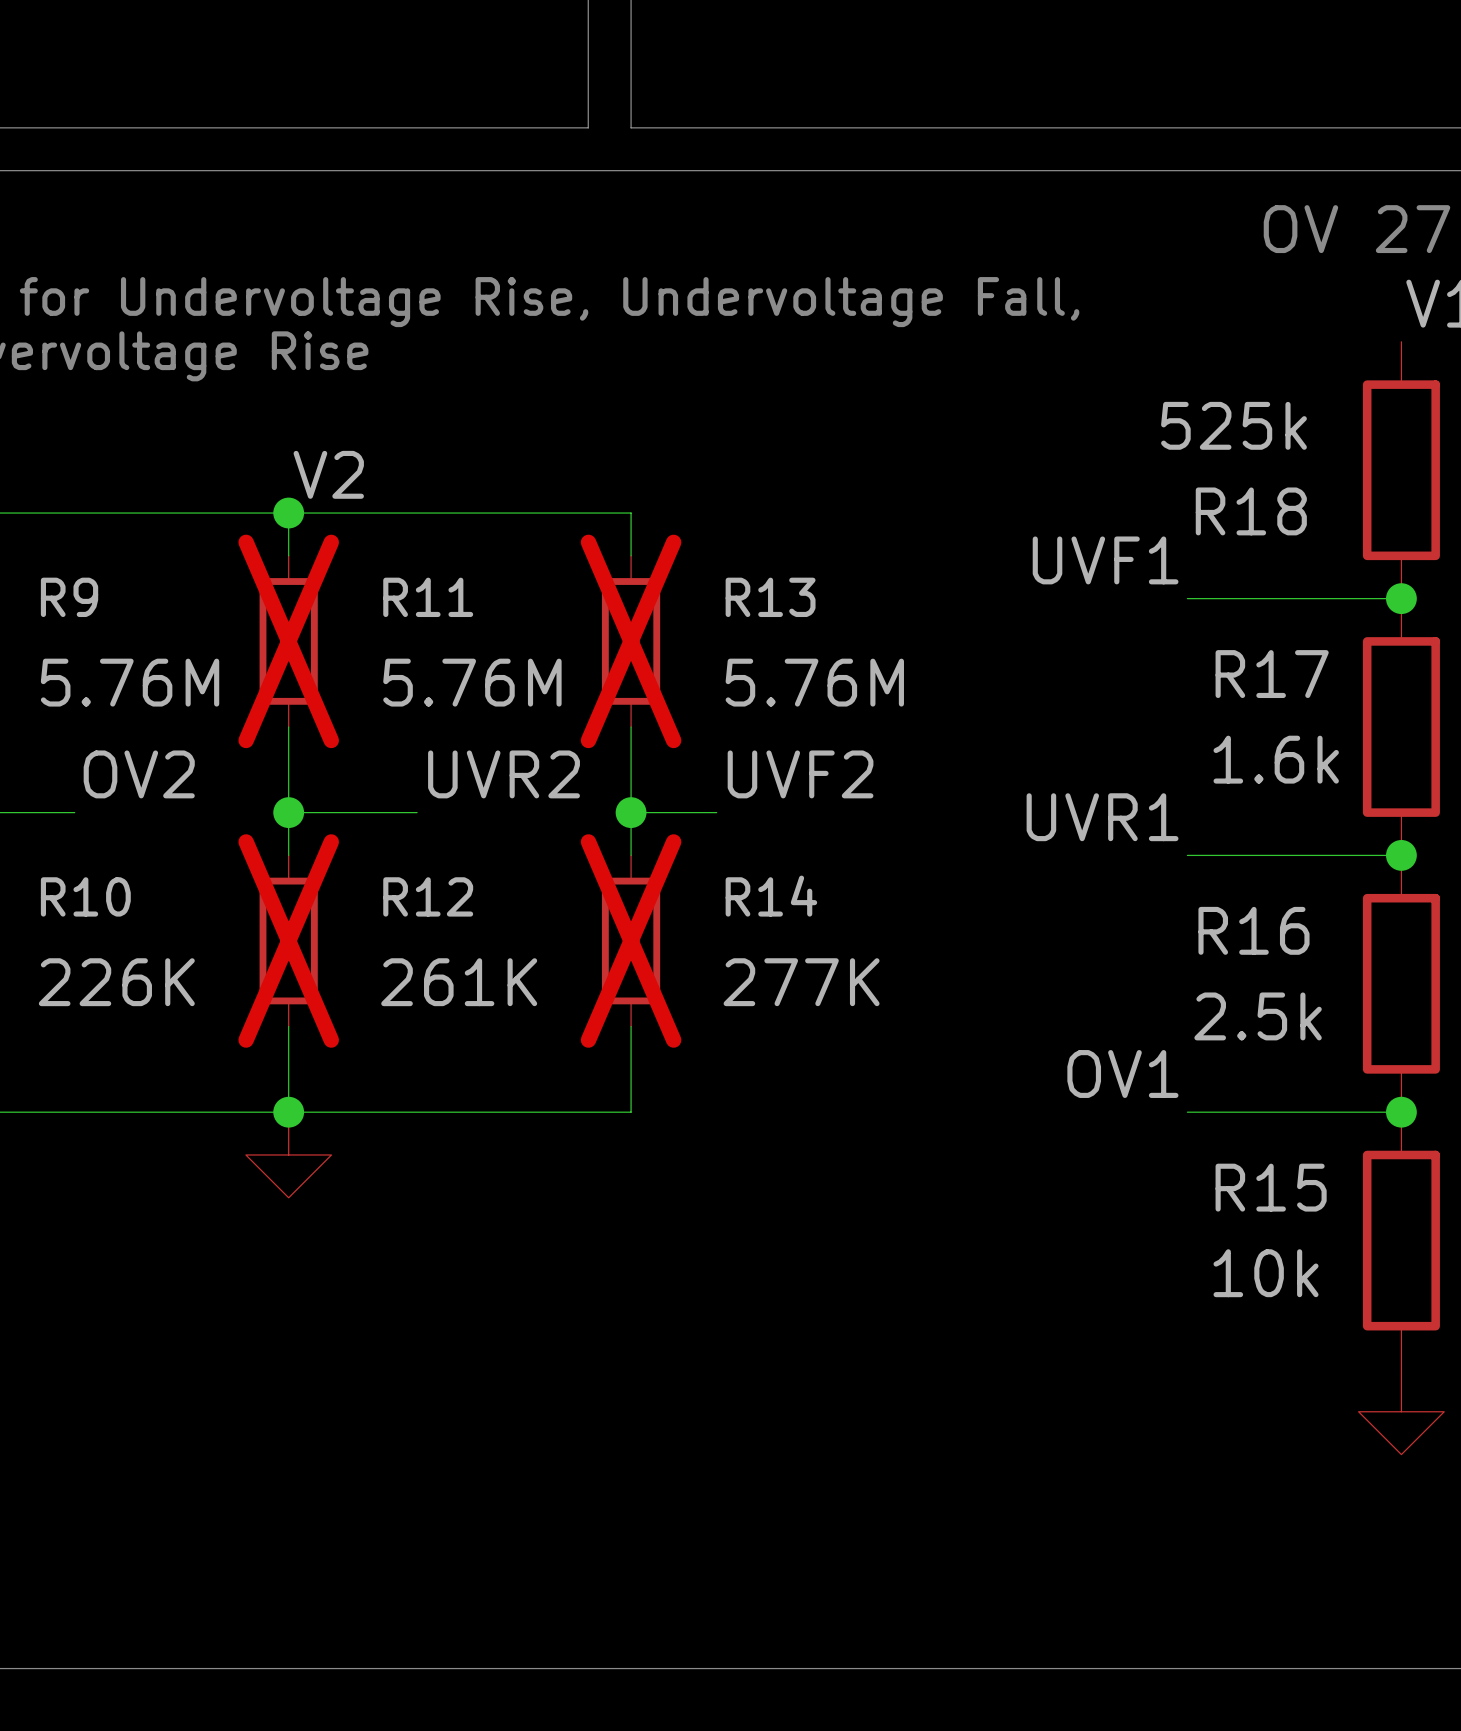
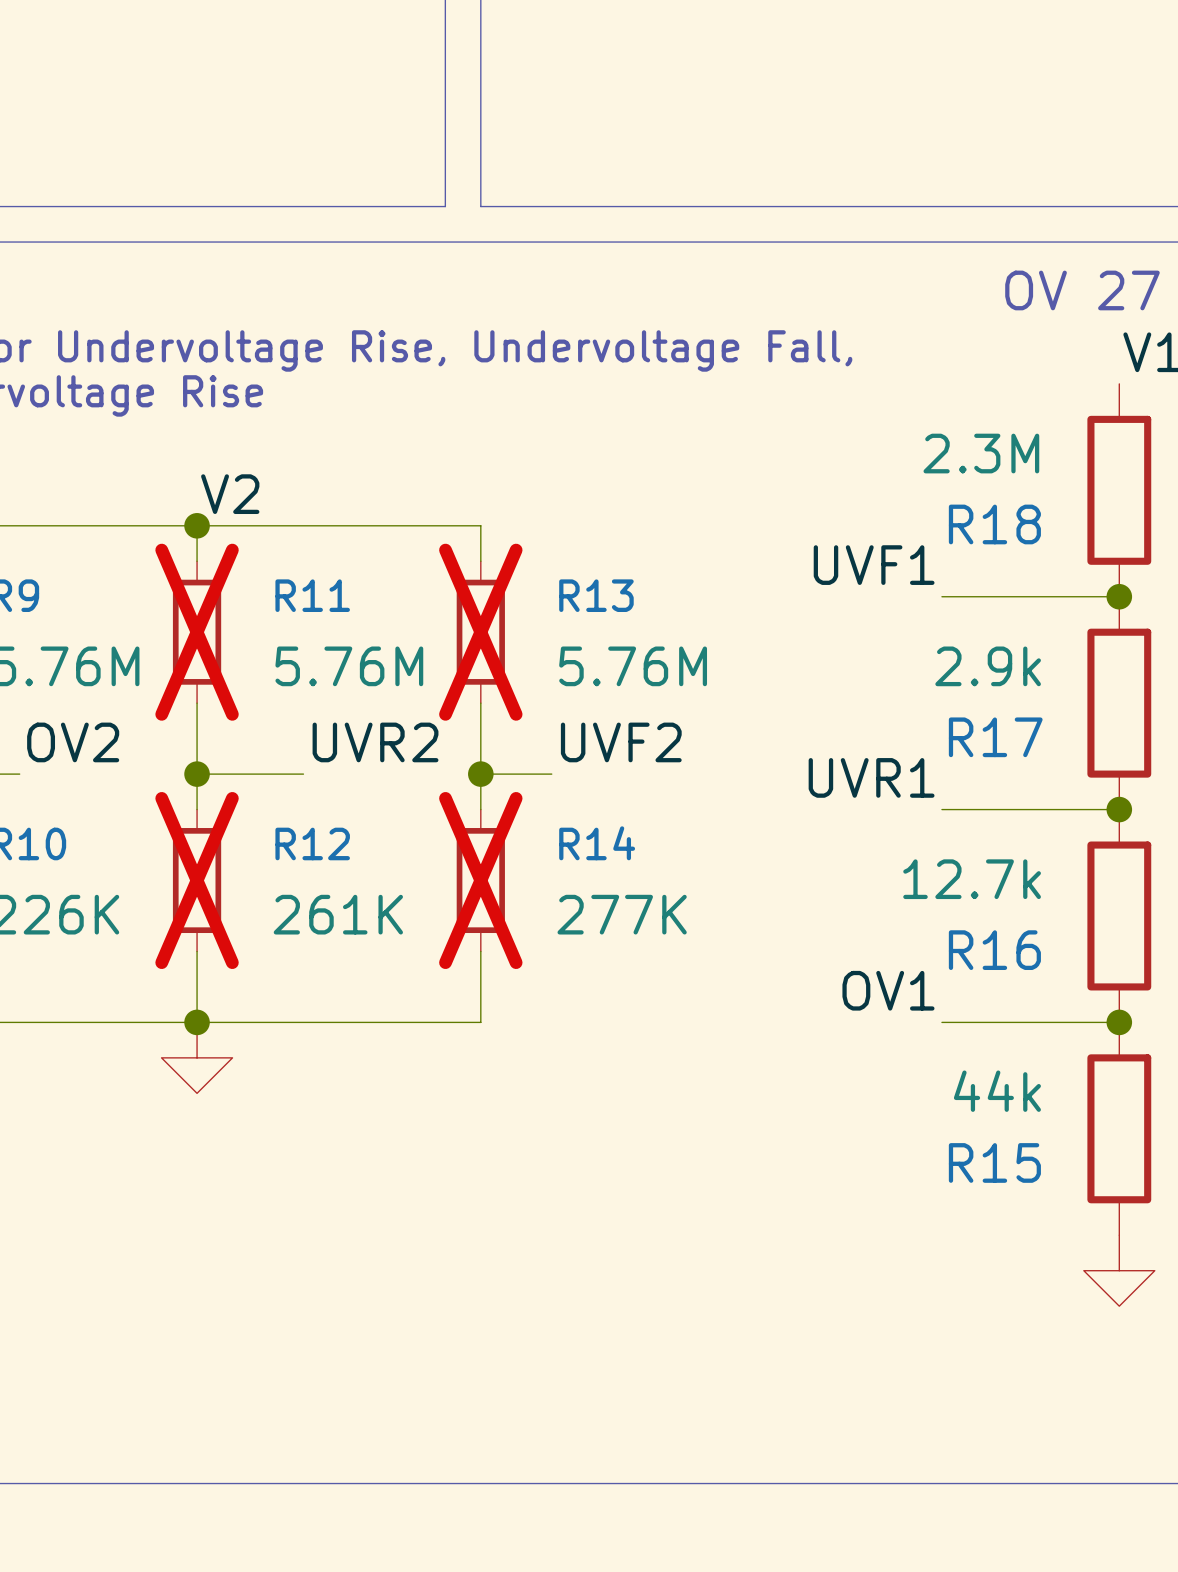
R18 value: 525k (1233, 425) -> 2.3M (981, 453)
R17 name position: R17 (1272, 674) -> R17 (995, 737)
R17 value: 1.6k (1276, 759) -> 2.9k (988, 666)
R16 name position: R16 (1253, 930) -> R16 (994, 950)
R16 value: 2.5k (1258, 1016) -> 12.7k (972, 879)
R15 name position: R15 (1271, 1187) -> R15 (994, 1162)
R15 value: 10k (1266, 1273) -> 44k (997, 1091)

